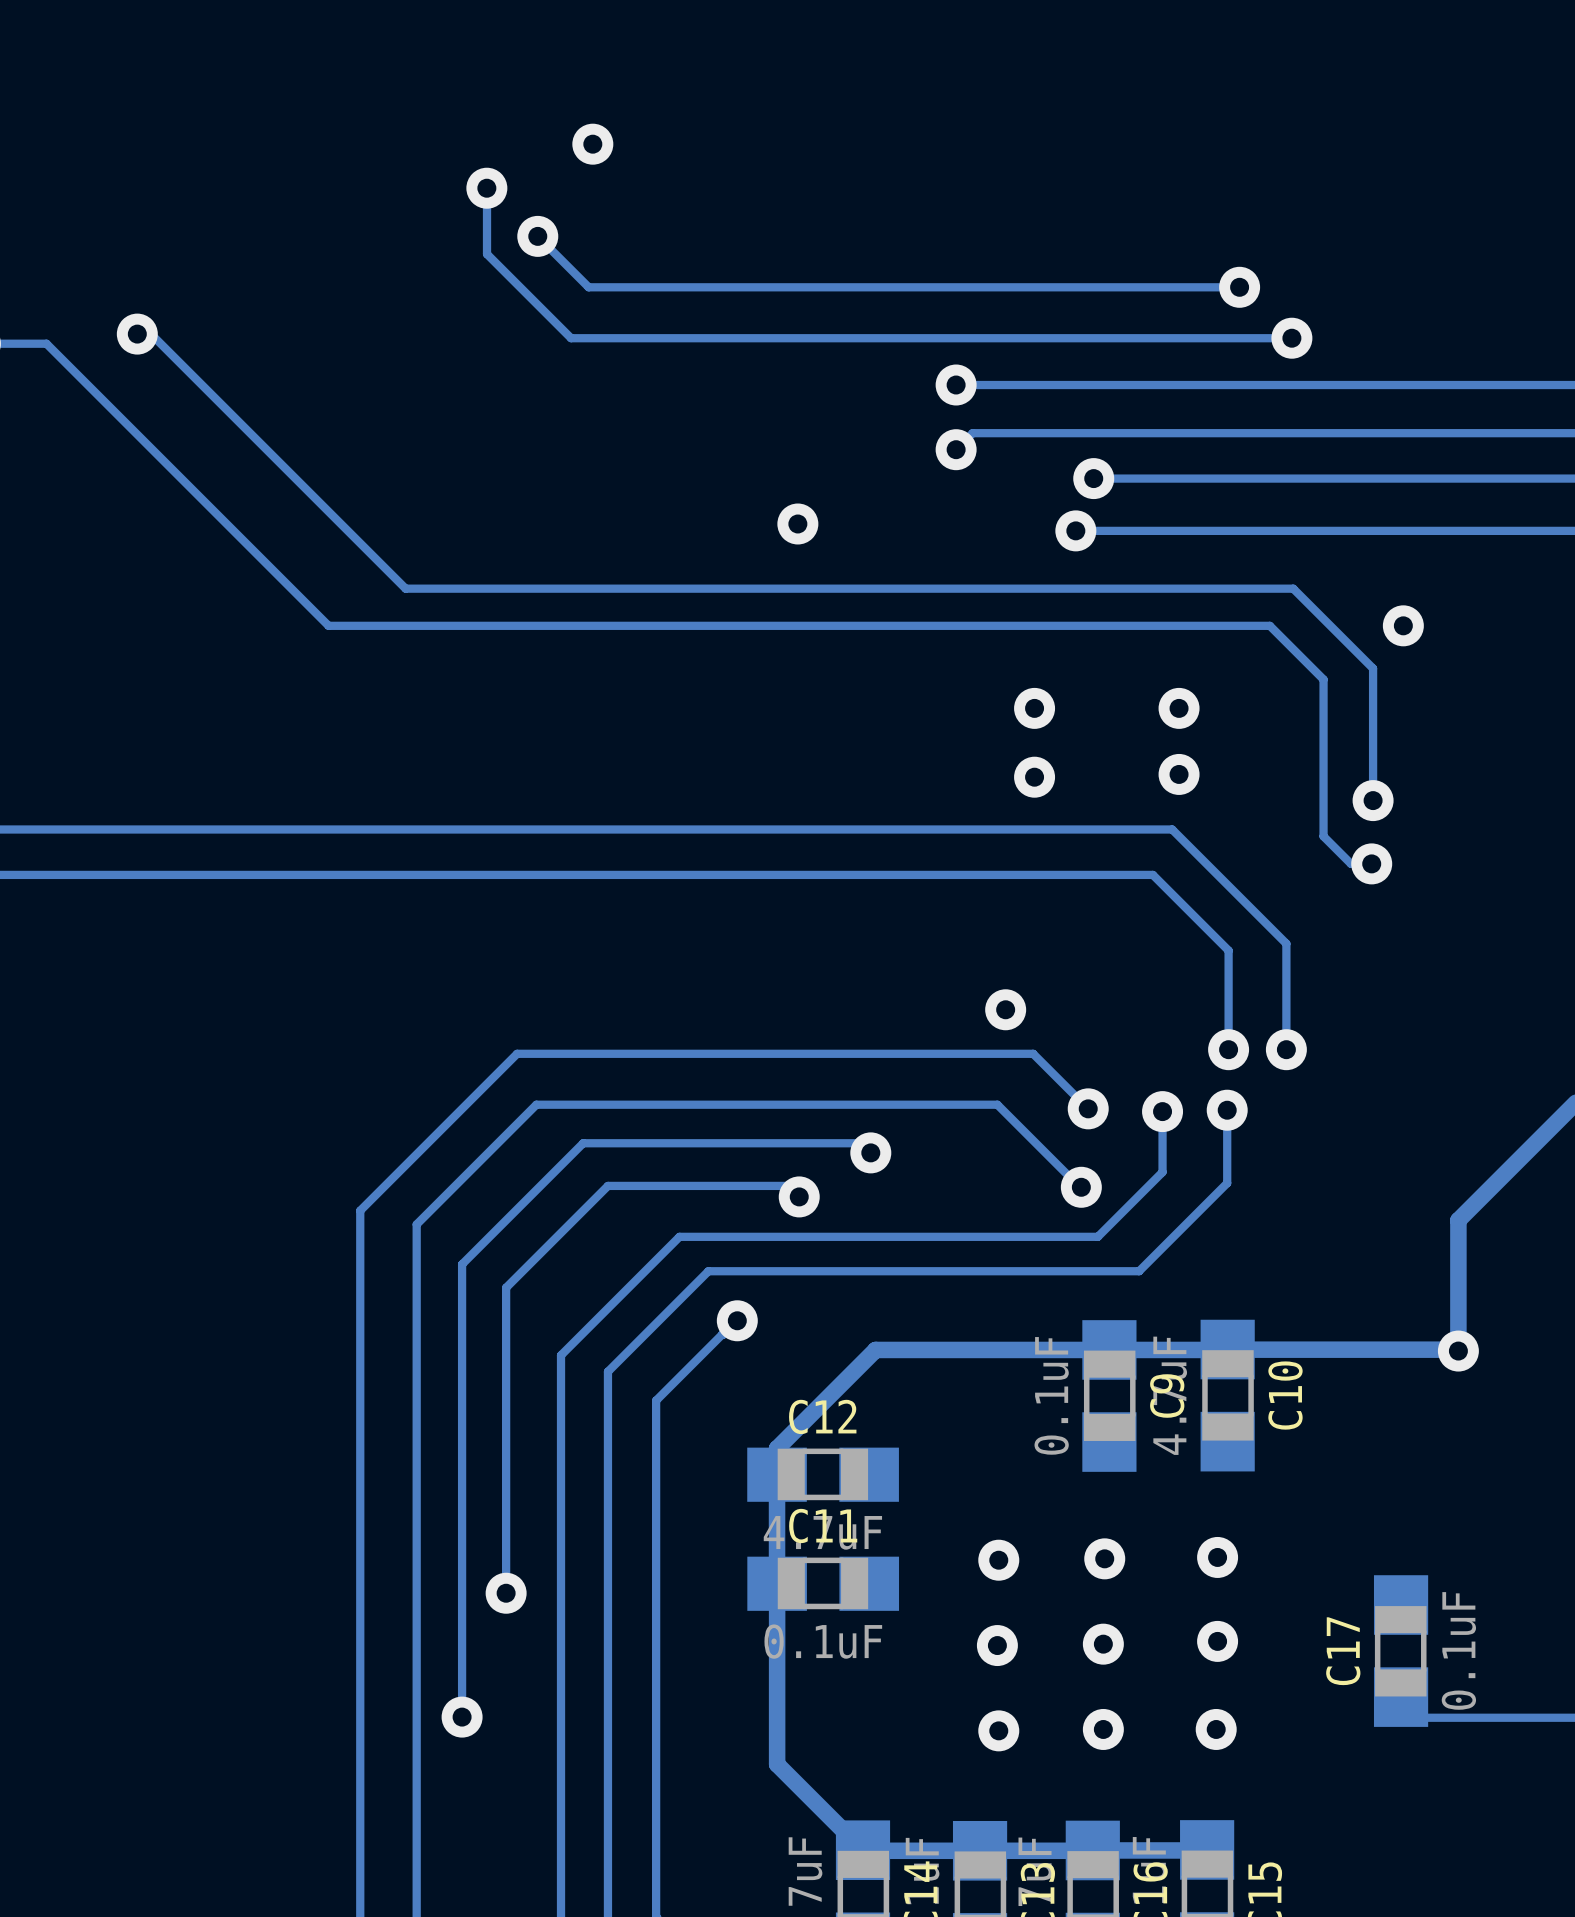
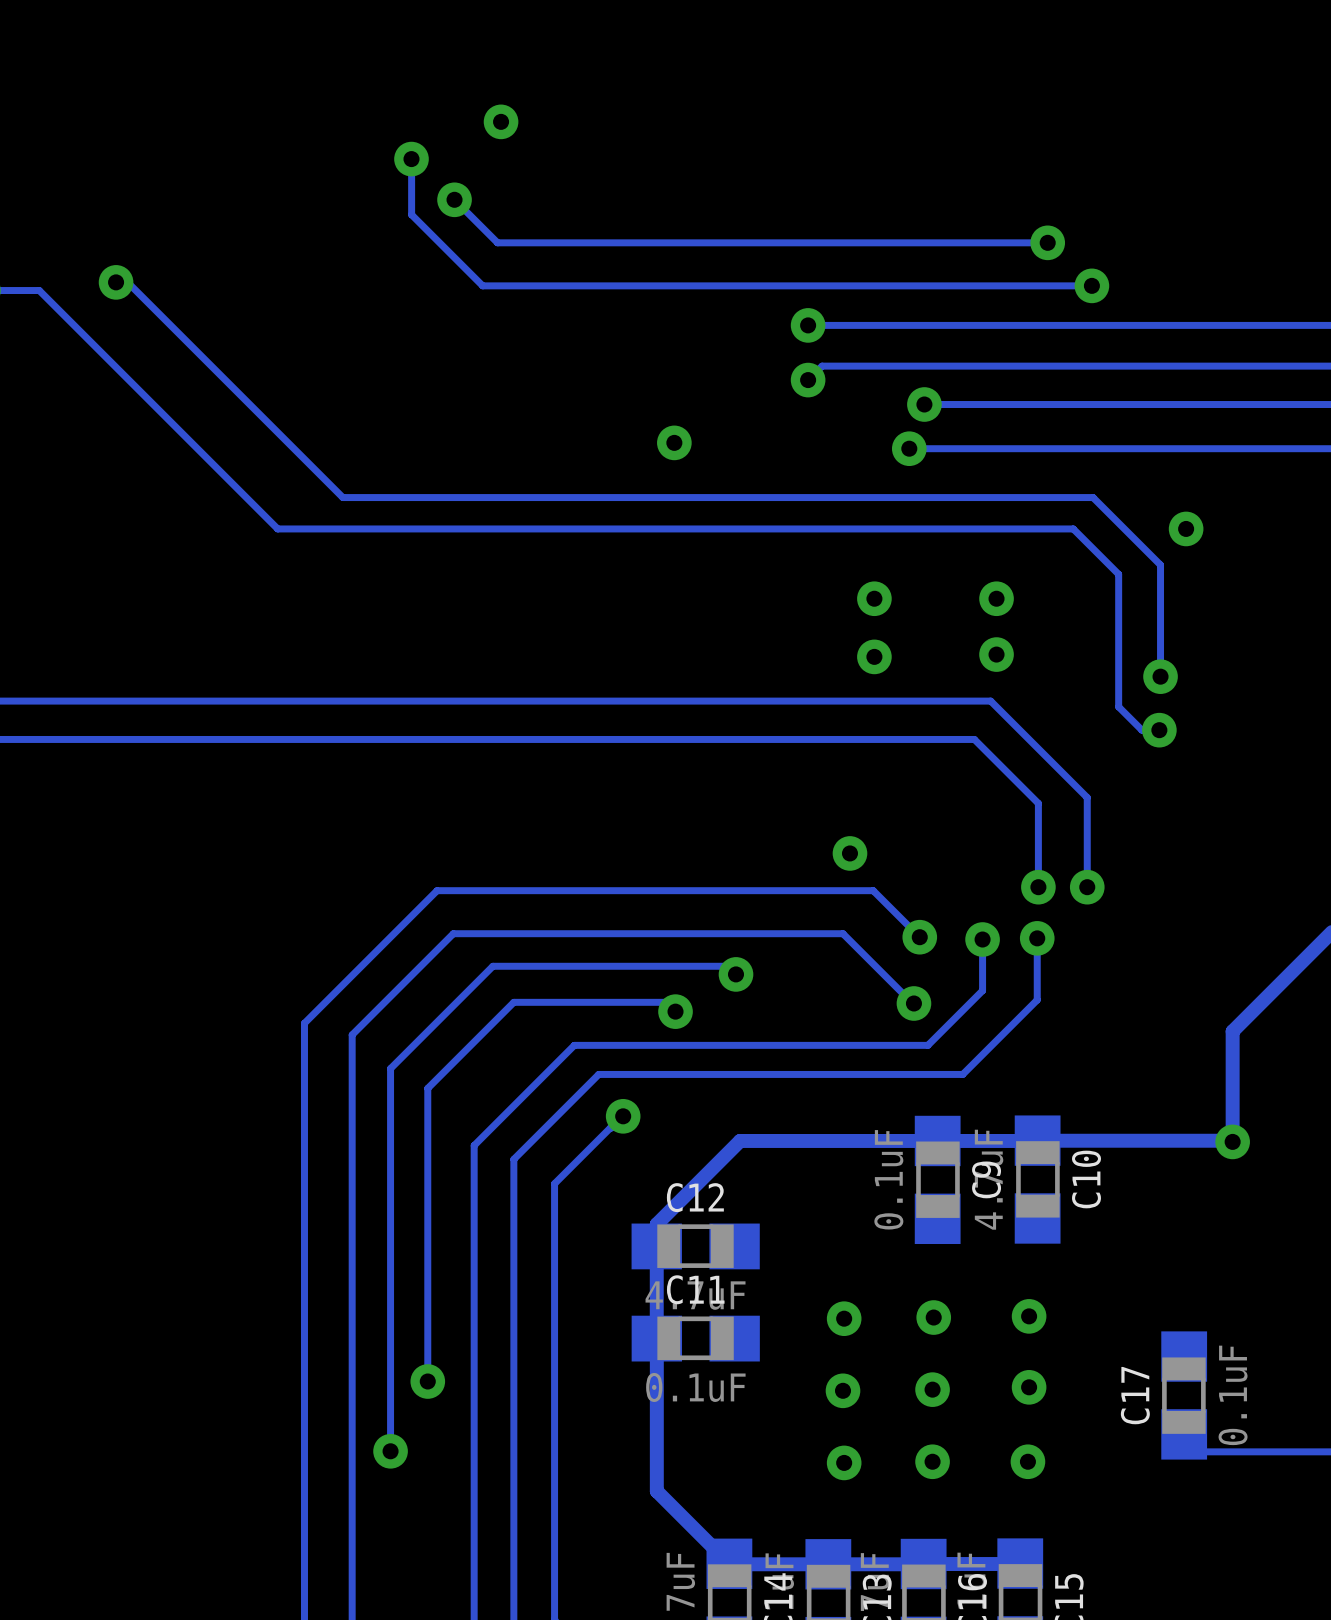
track: none -> (427, 1346) (427, 1381)
via position: (506, 1593) -> (427, 1381)

